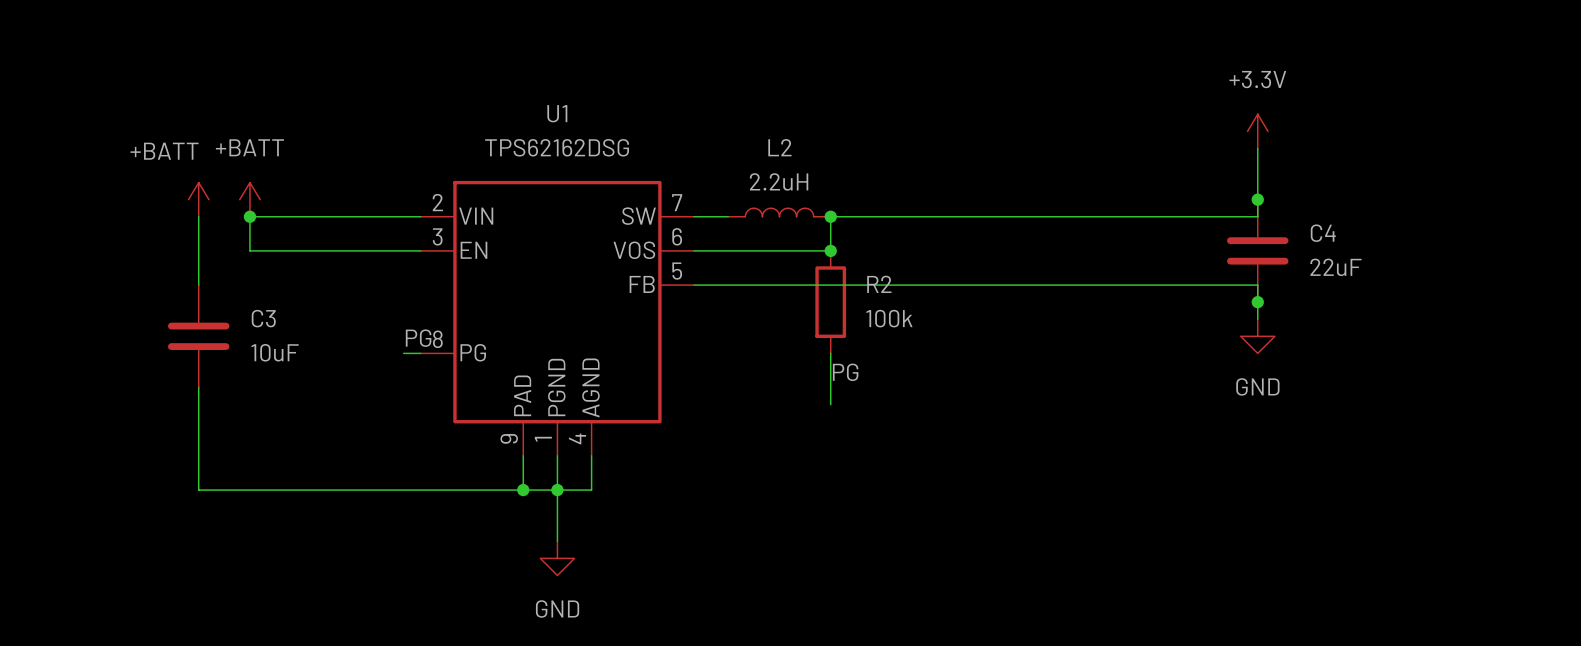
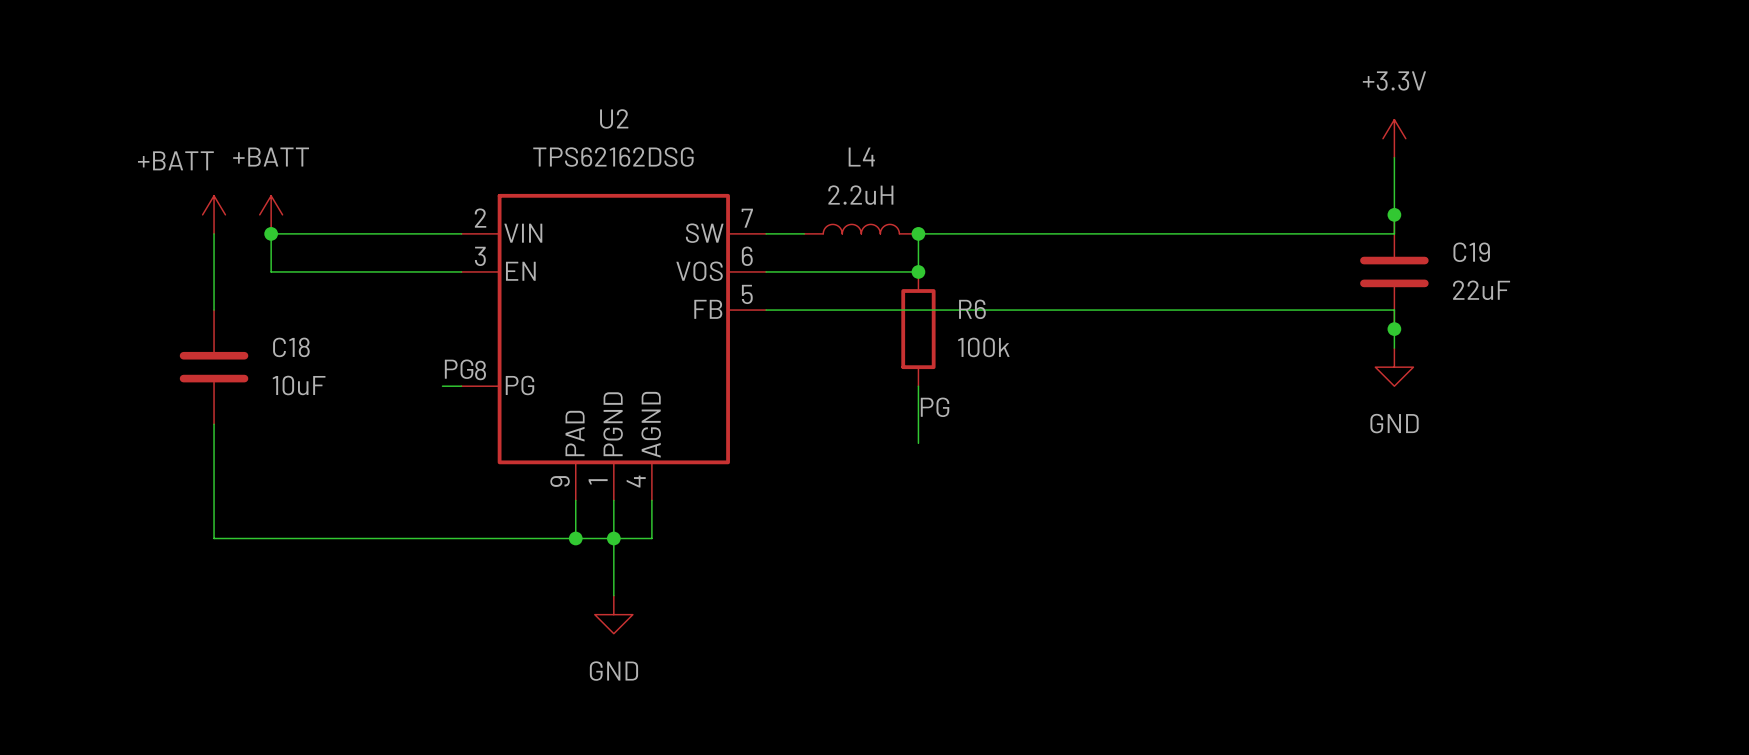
U1 name: U1 (557, 113) -> U2 (614, 118)
L2 name: L2 (779, 147) -> L4 (861, 157)
C4 name: C4 (1323, 233) -> C19 (1471, 252)
R2 name: R2 (879, 284) -> R6 (972, 309)
C3 name: C3 (263, 318) -> C18 (291, 347)

